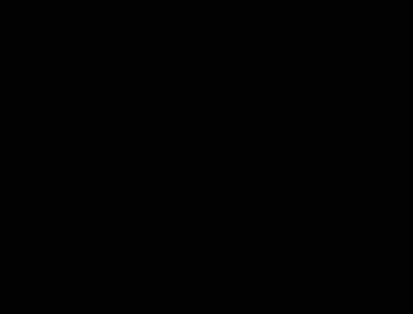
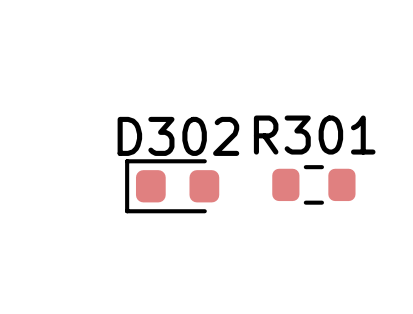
R301: none -> (313, 184)
D302: none -> (172, 186)

